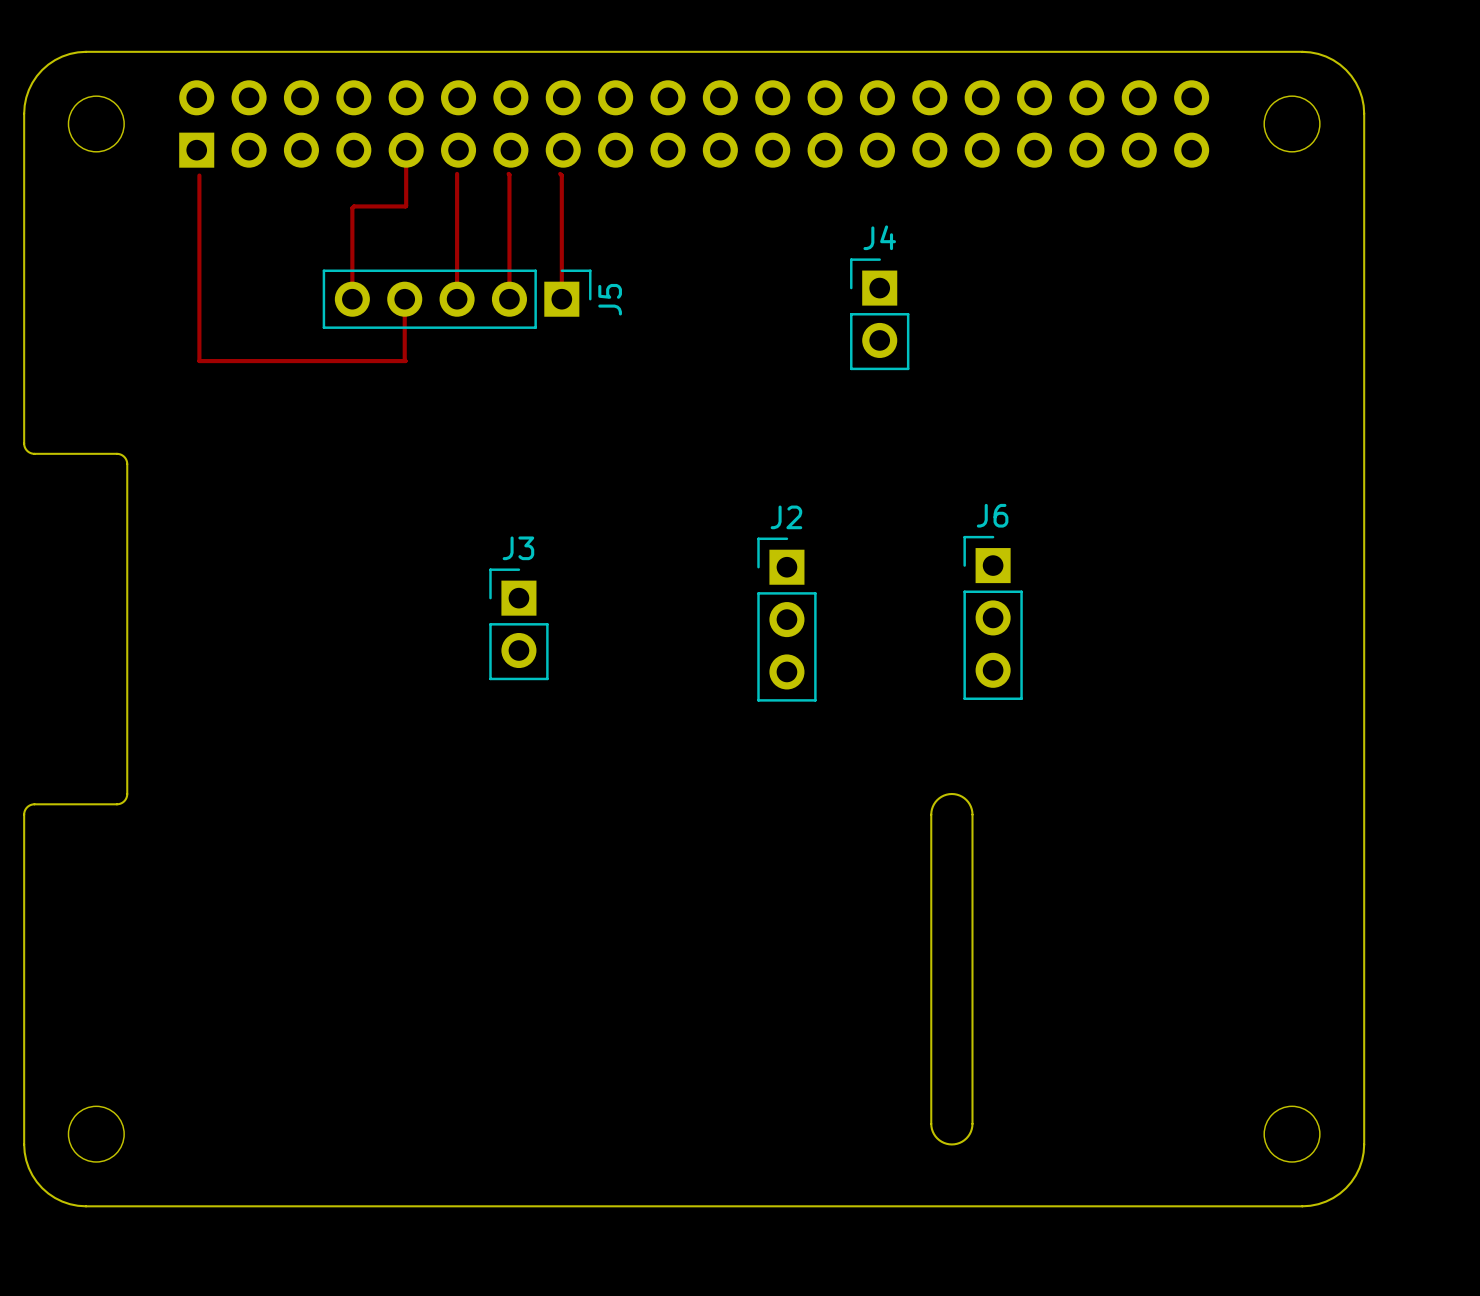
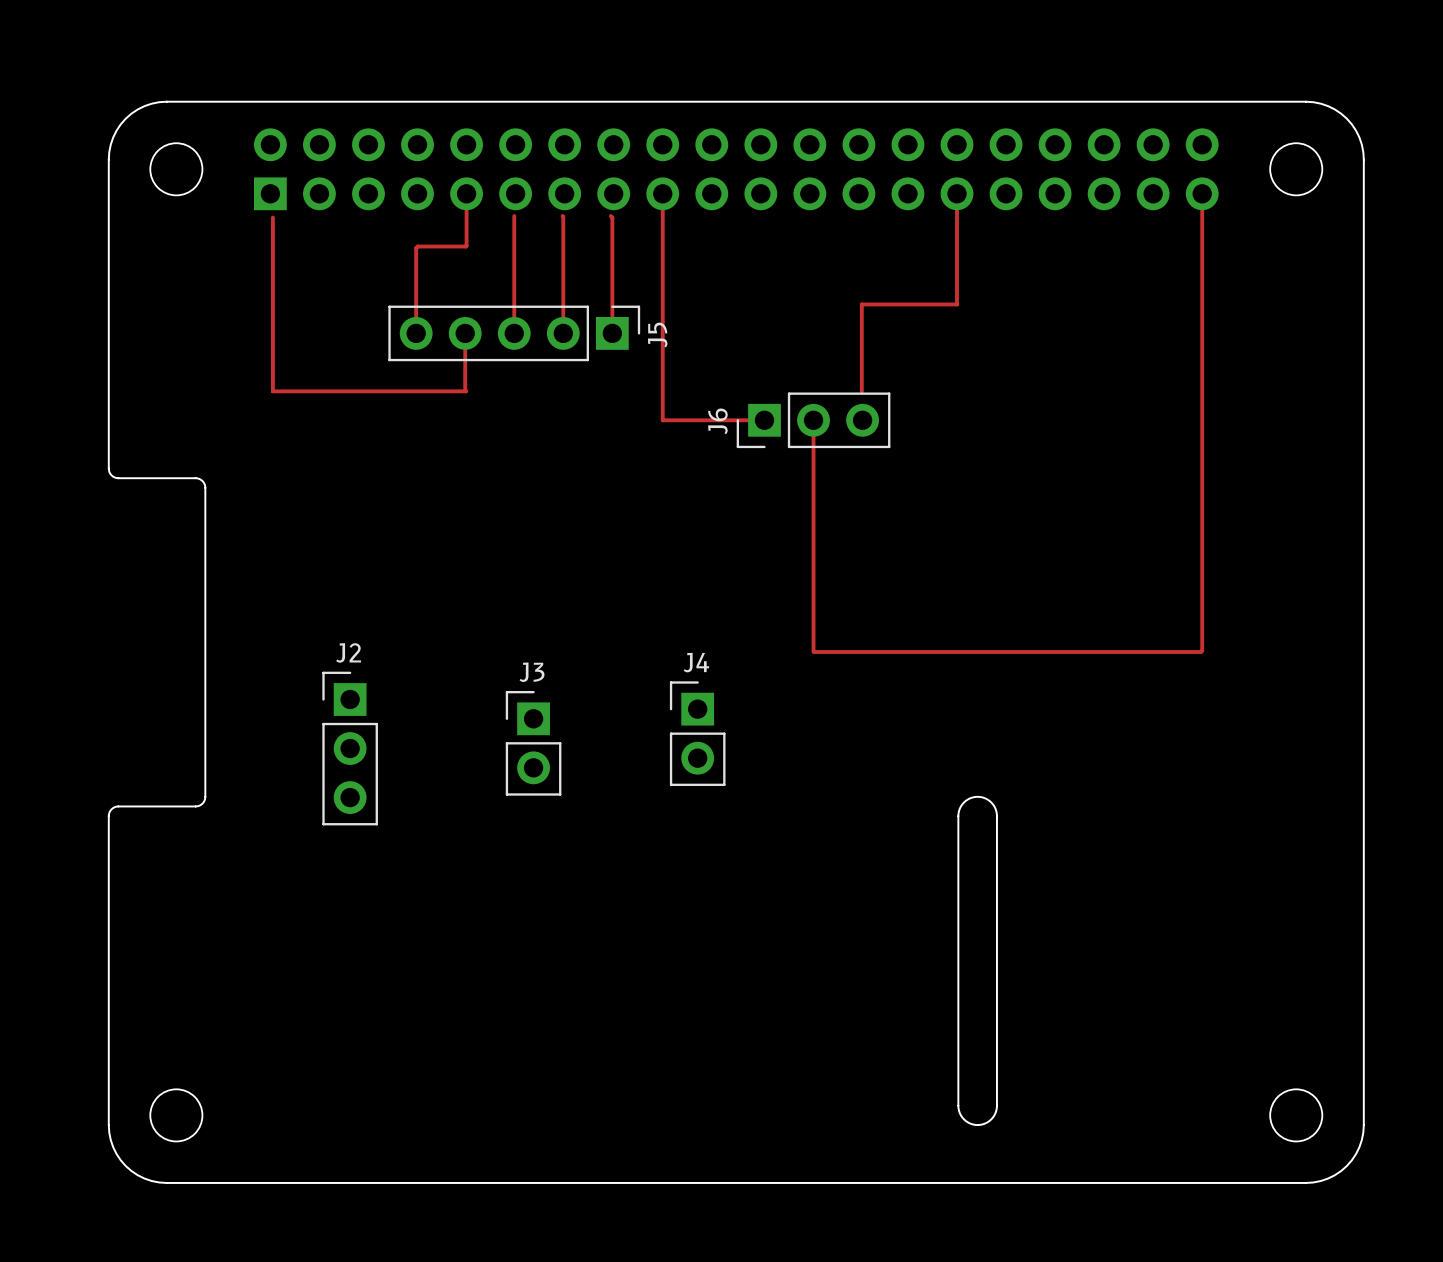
top track: none -> (662, 193) (662, 420) (764, 420)
top track: none -> (953, 193) (957, 193) (957, 304) (861, 304) (861, 391)
top track: none -> (1202, 193) (1202, 650) (815, 651)
J4 position: (879, 314) -> (697, 733)
top track: none -> (813, 425) (813, 651)
J6 rotation: 0° (993, 617) -> 90° counterclockwise (813, 420)
J6 position: (993, 617) -> (813, 420)
J2 position: (786, 619) -> (350, 748)
J3 position: (518, 624) -> (533, 743)

